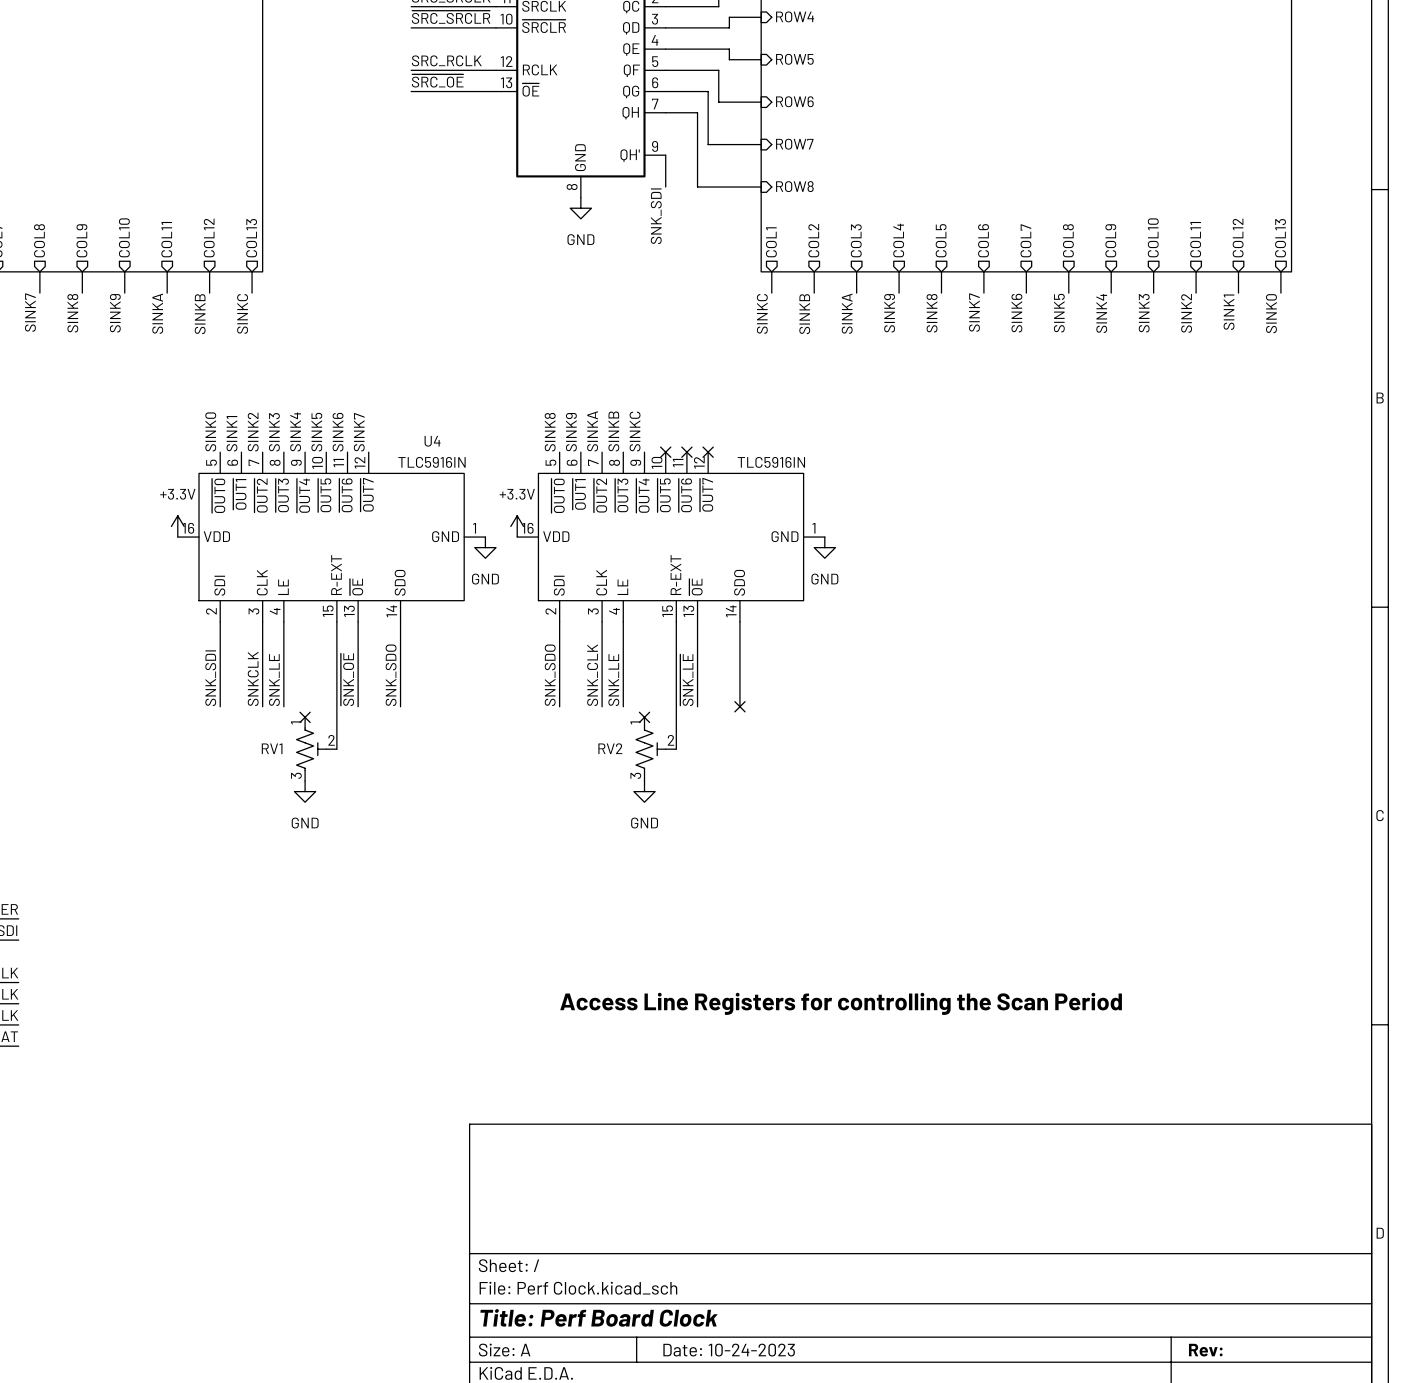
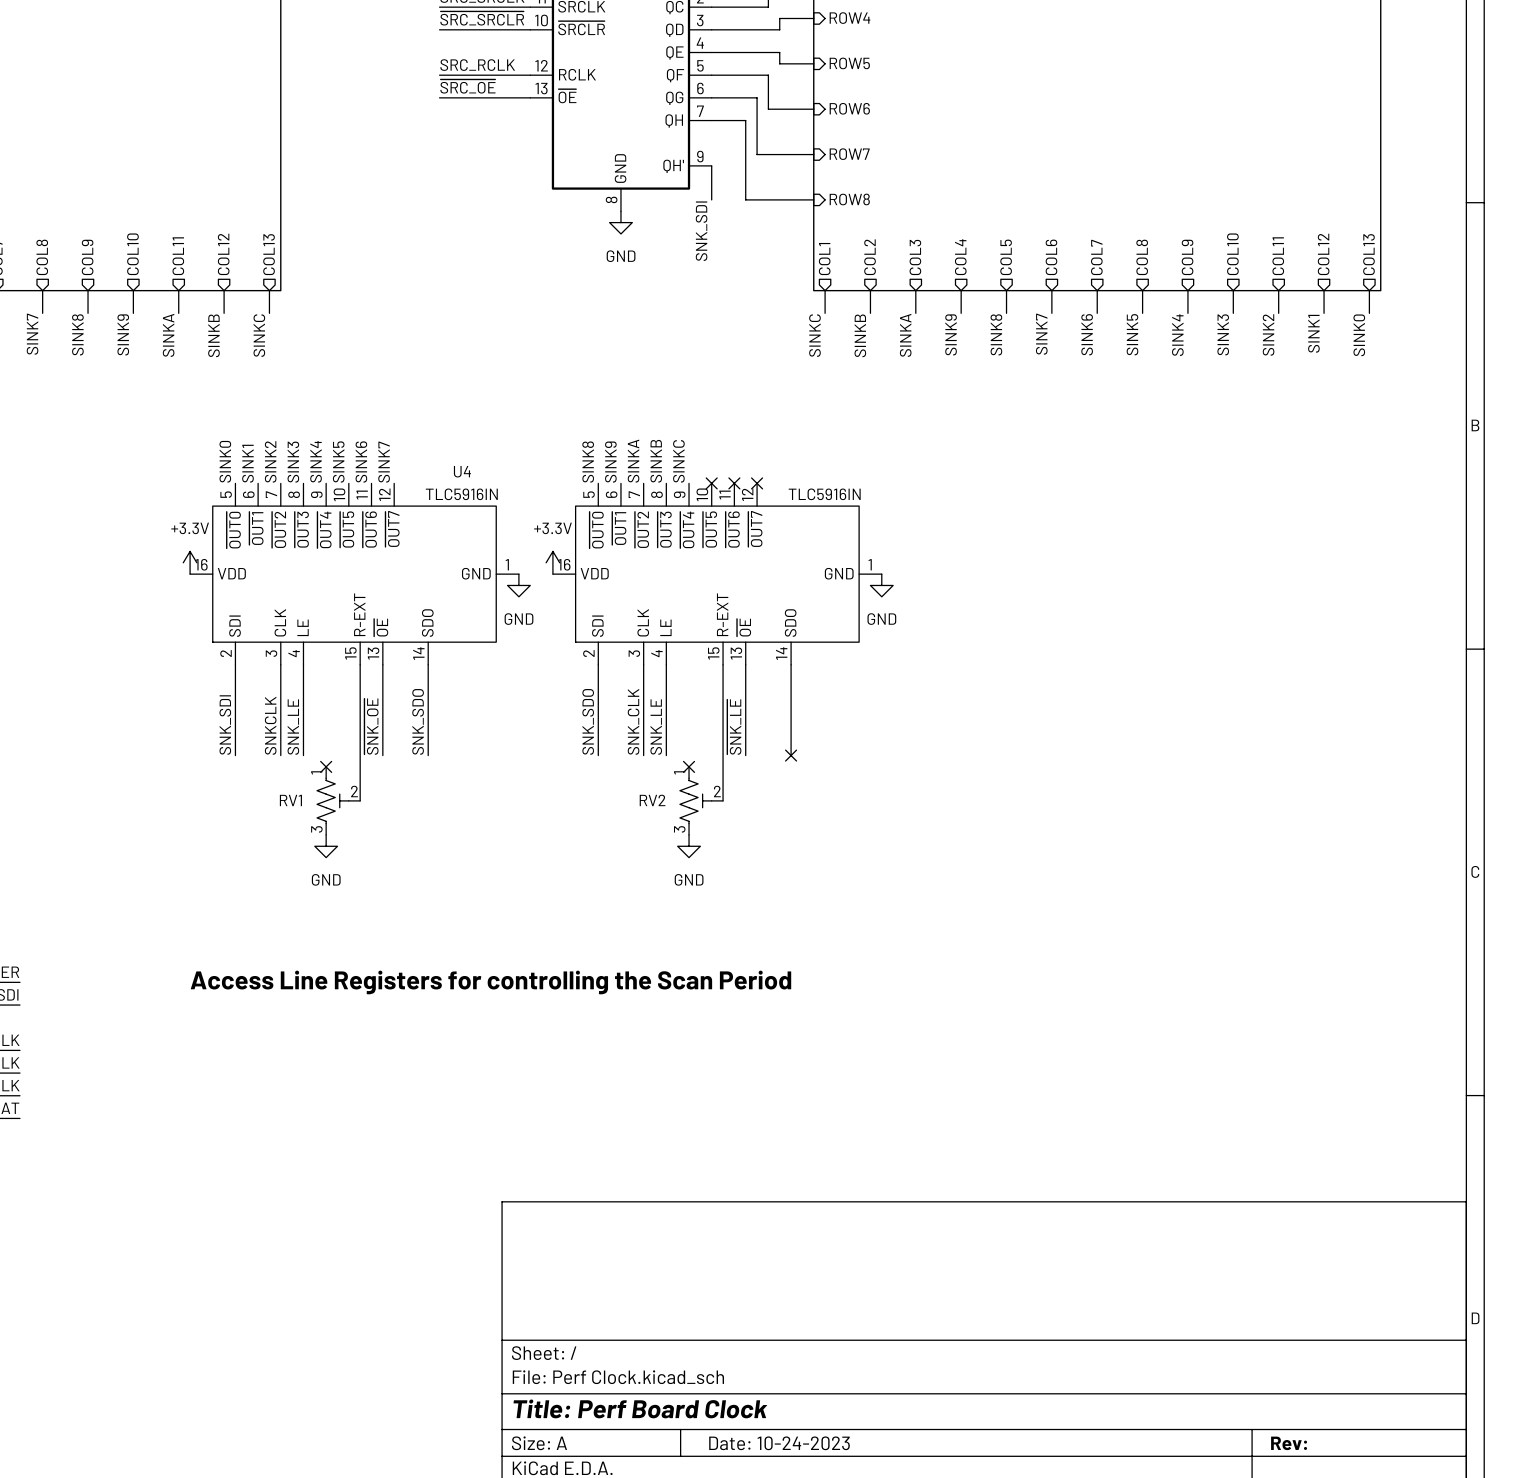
text: none -> Access Line Registers for controlling the Scan Period (490, 982)
text: Access Line Registers for controlling the Scan Period (841, 1003) -> none

